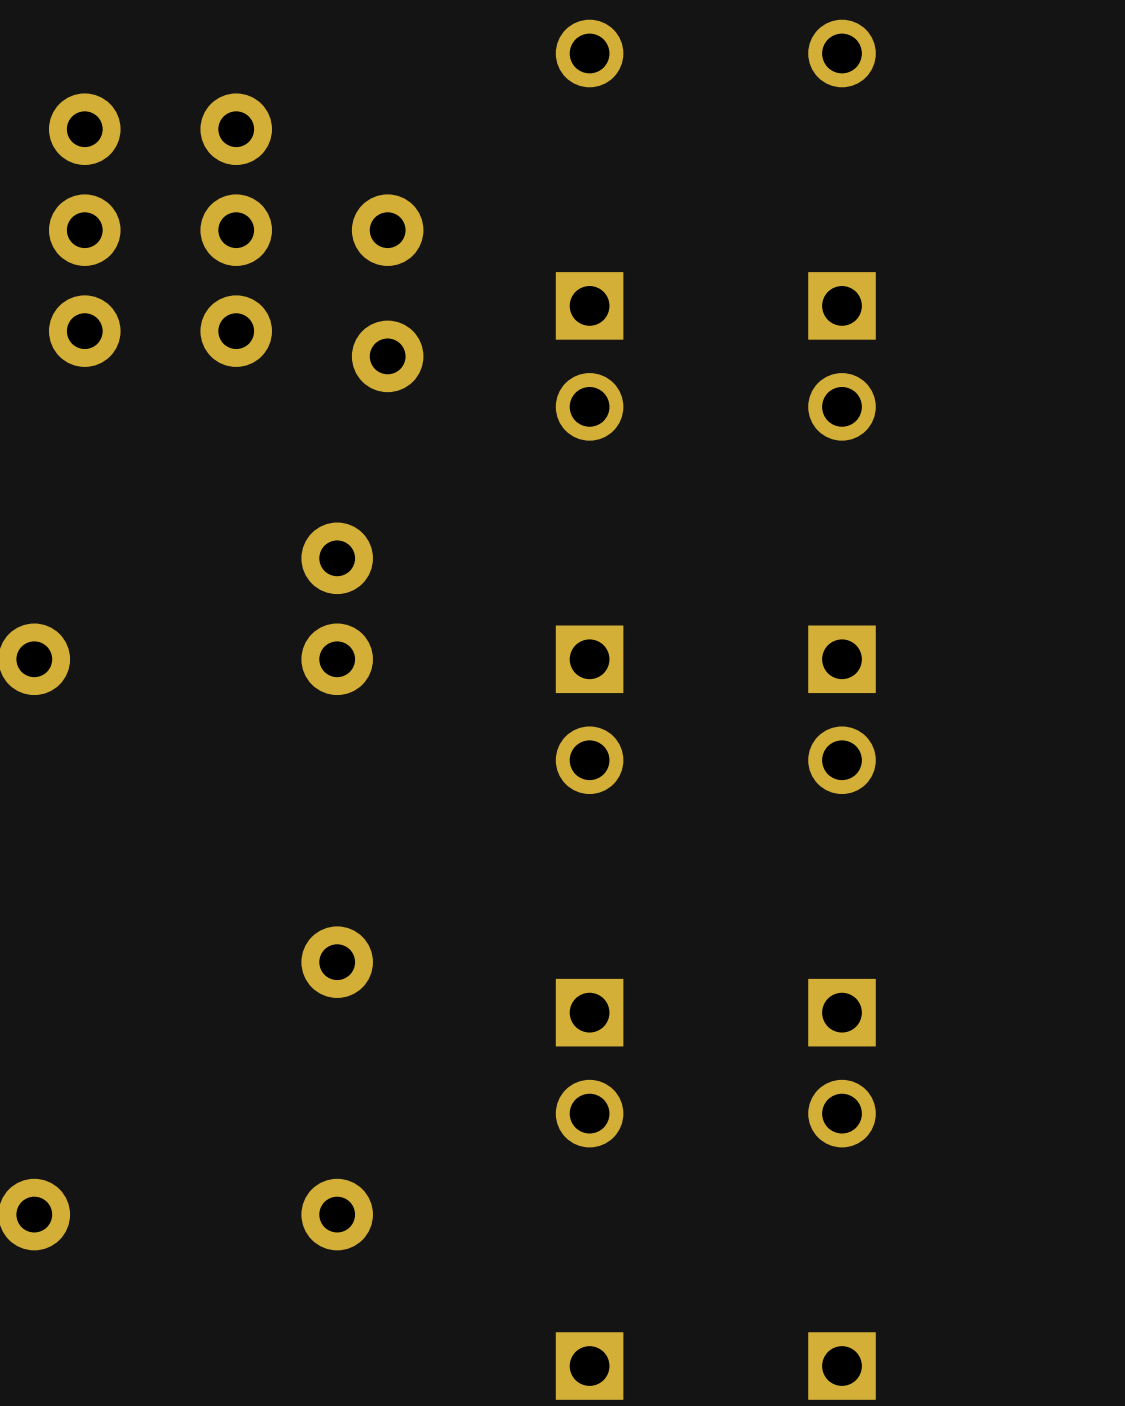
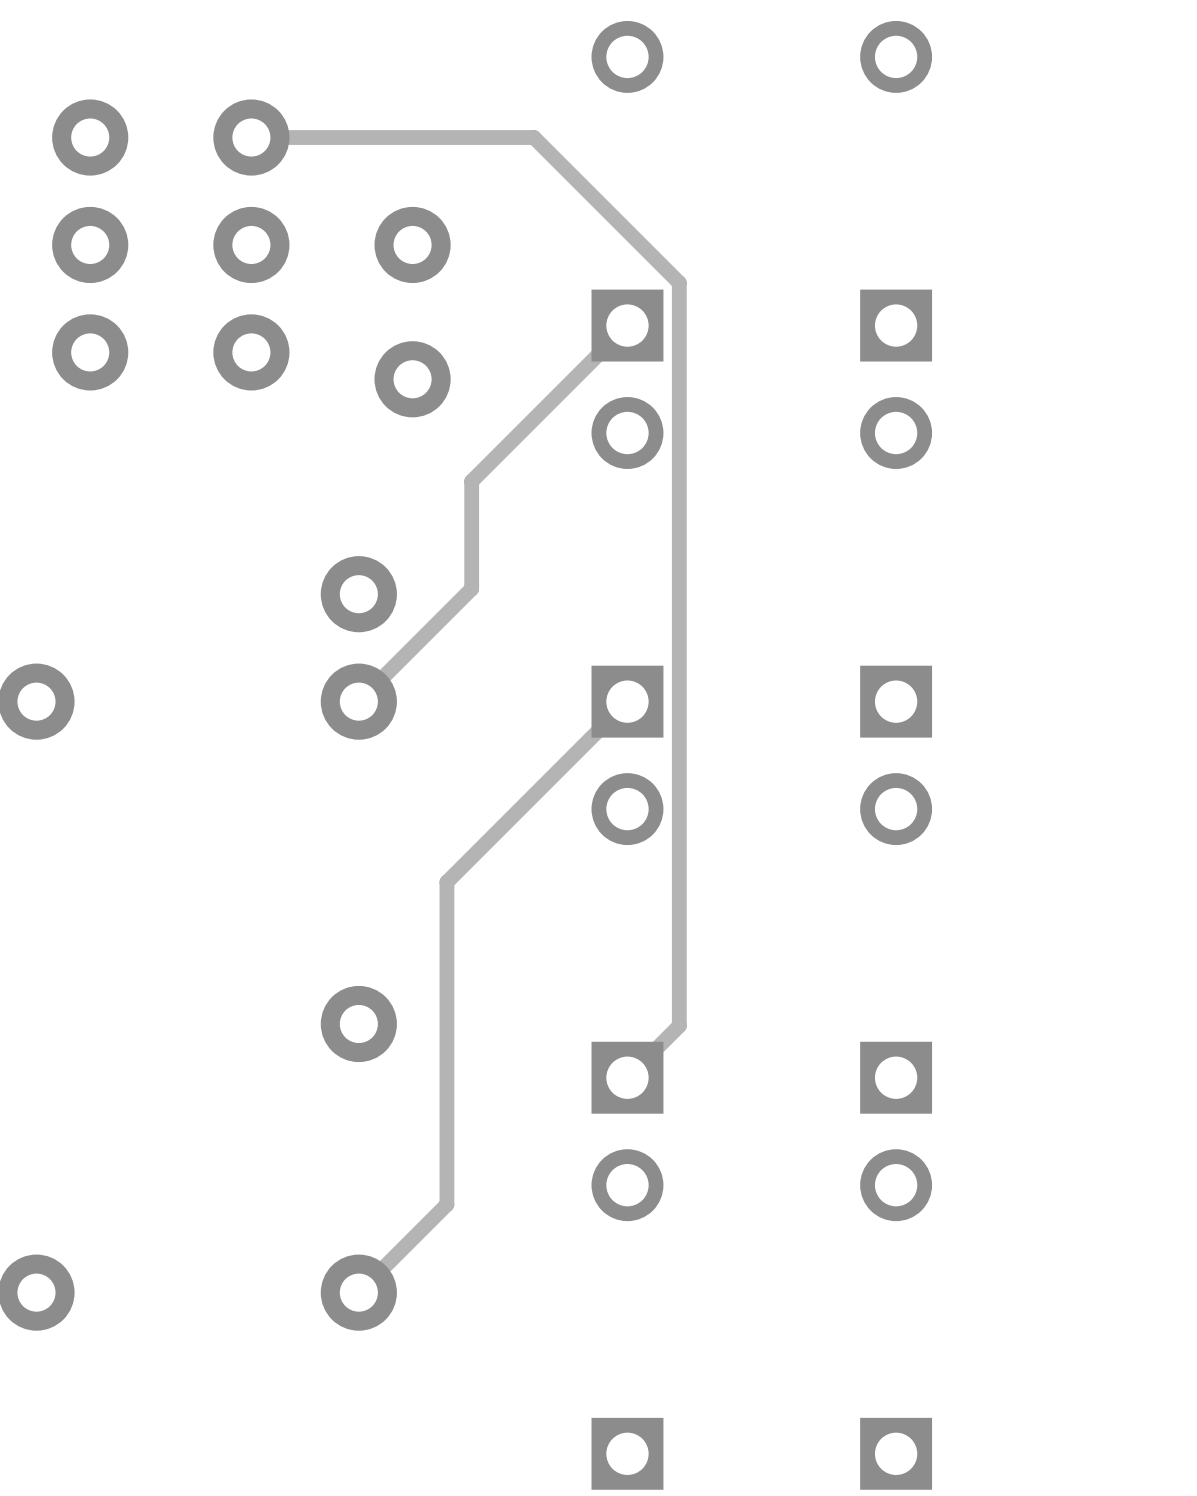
track: none -> (251, 137) (533, 137) (679, 282) (679, 1025) (627, 1077)
track: none -> (627, 325) (471, 481) (471, 588) (358, 701)
track: none -> (627, 701) (446, 882) (446, 1204) (358, 1292)

